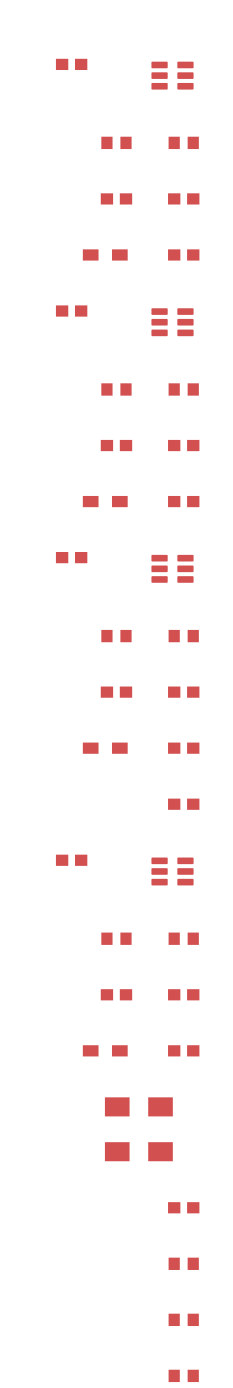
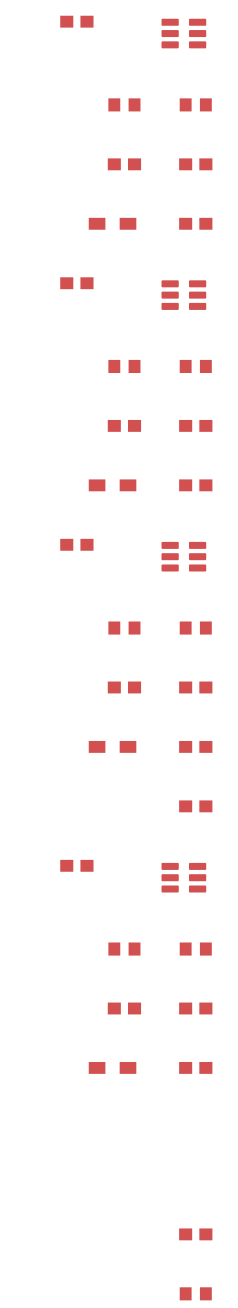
part: (138, 1106) -> none
part: (138, 1151) -> none

